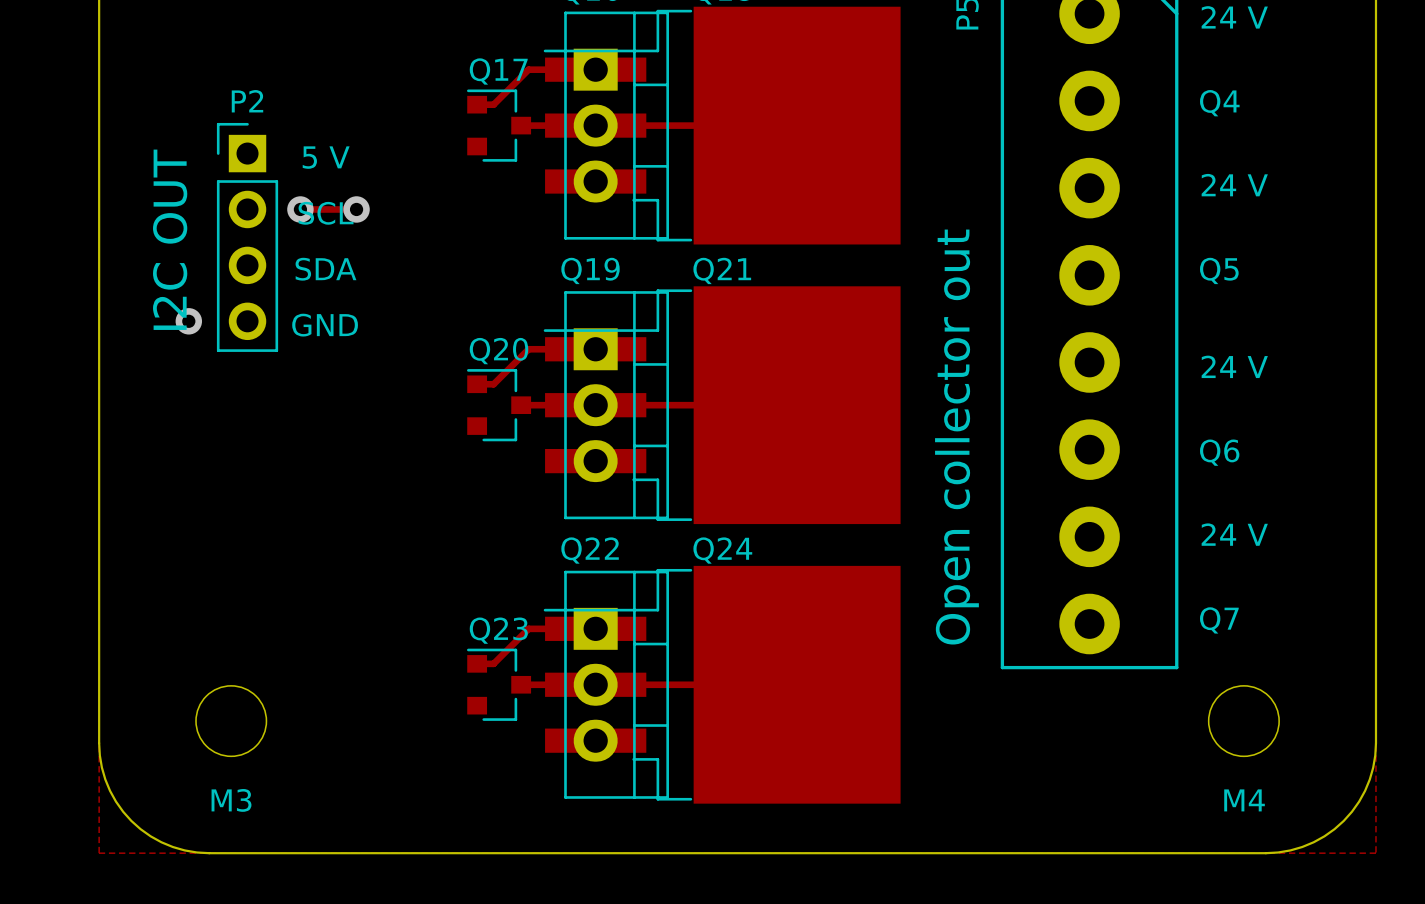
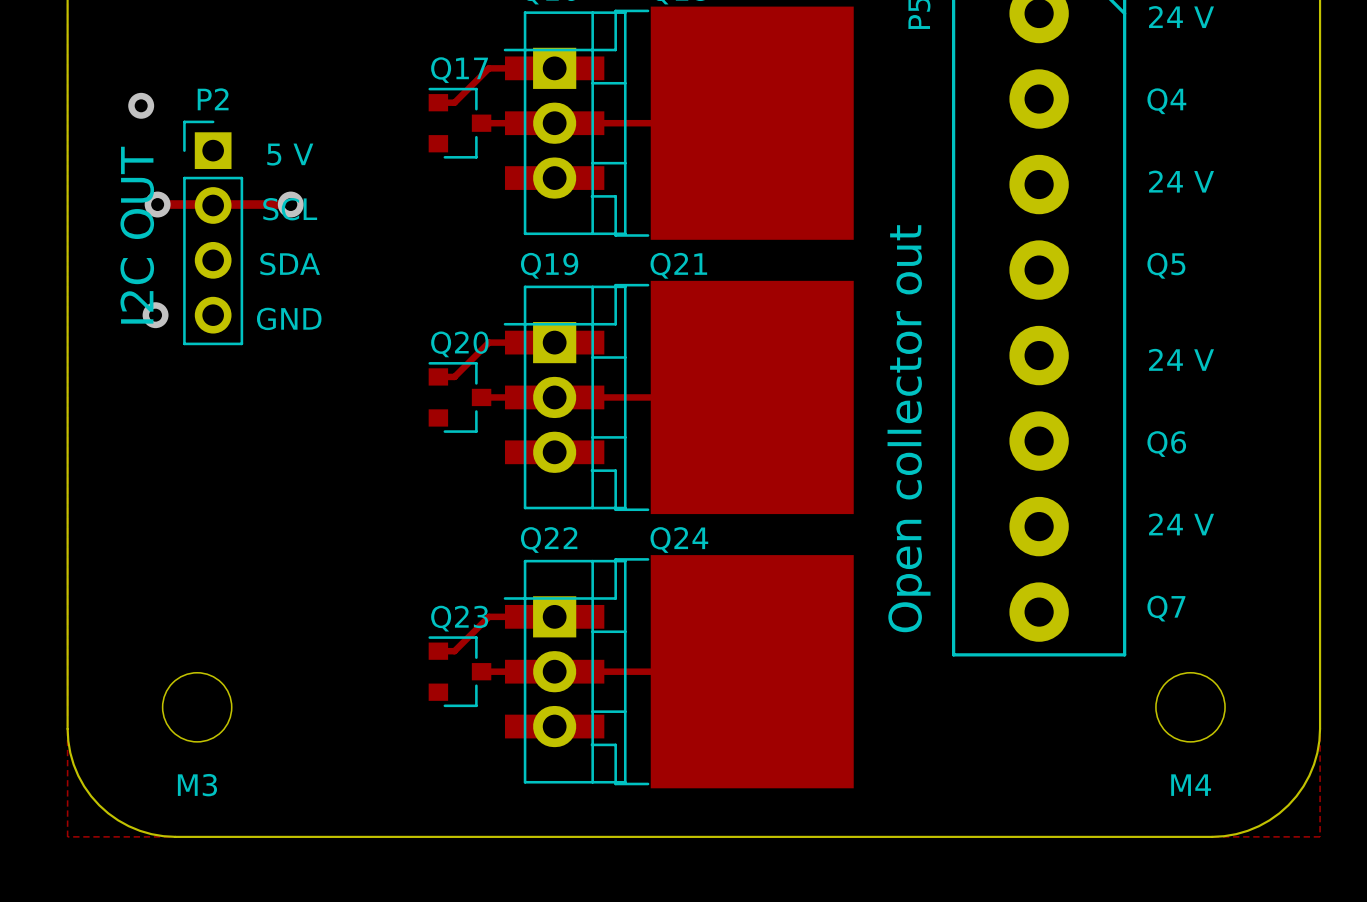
via: none -> (141, 105)
track: none -> (157, 204) (290, 204)
via: none -> (157, 204)
via: none -> (290, 204)
track: (300, 209) (356, 209) -> none
via: (300, 209) -> none
via: (356, 209) -> none

